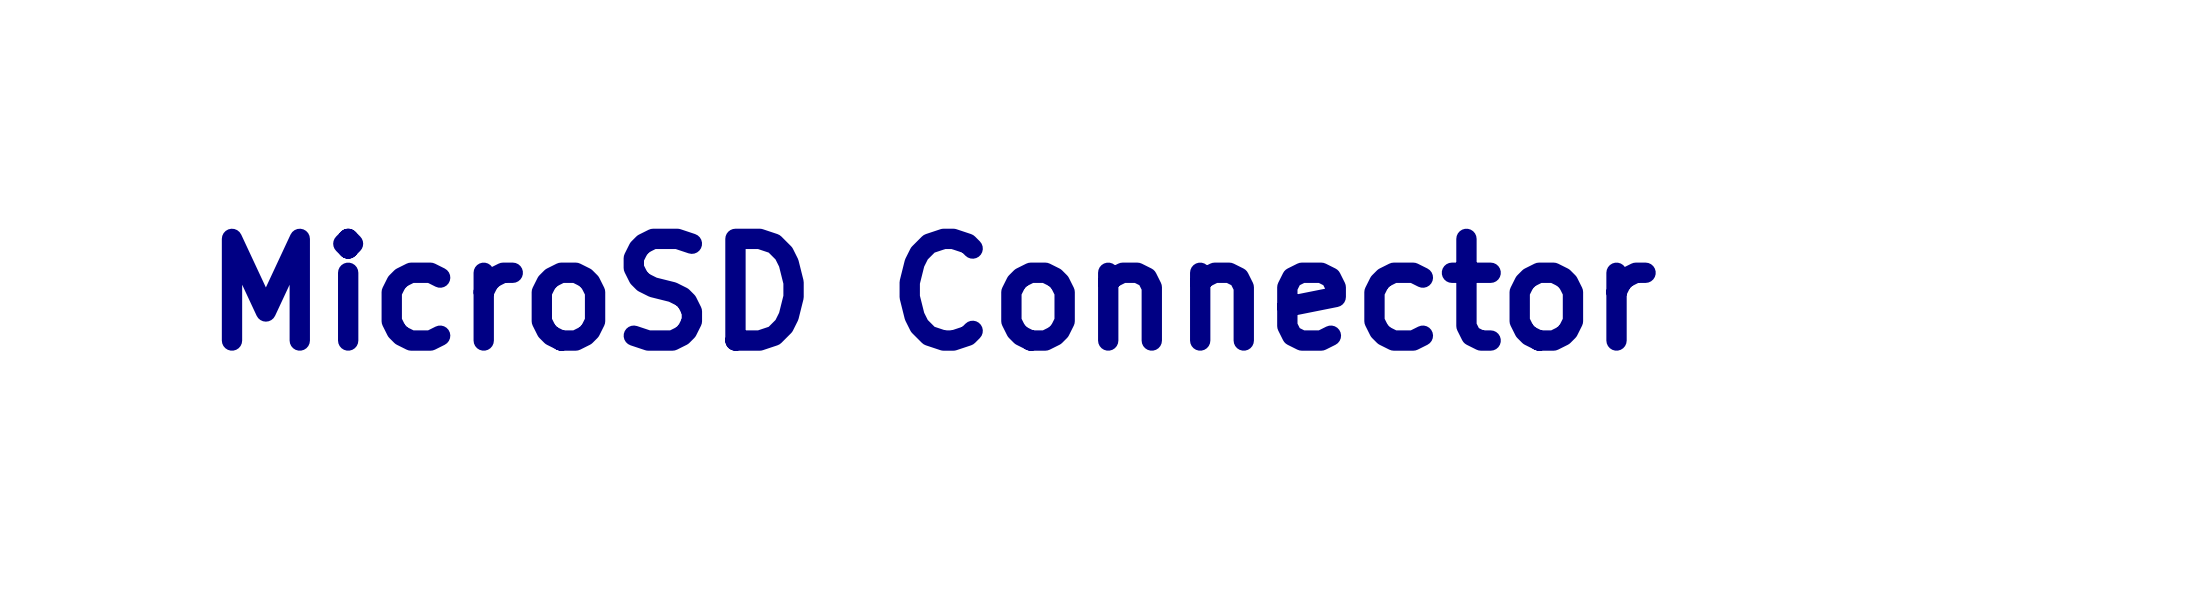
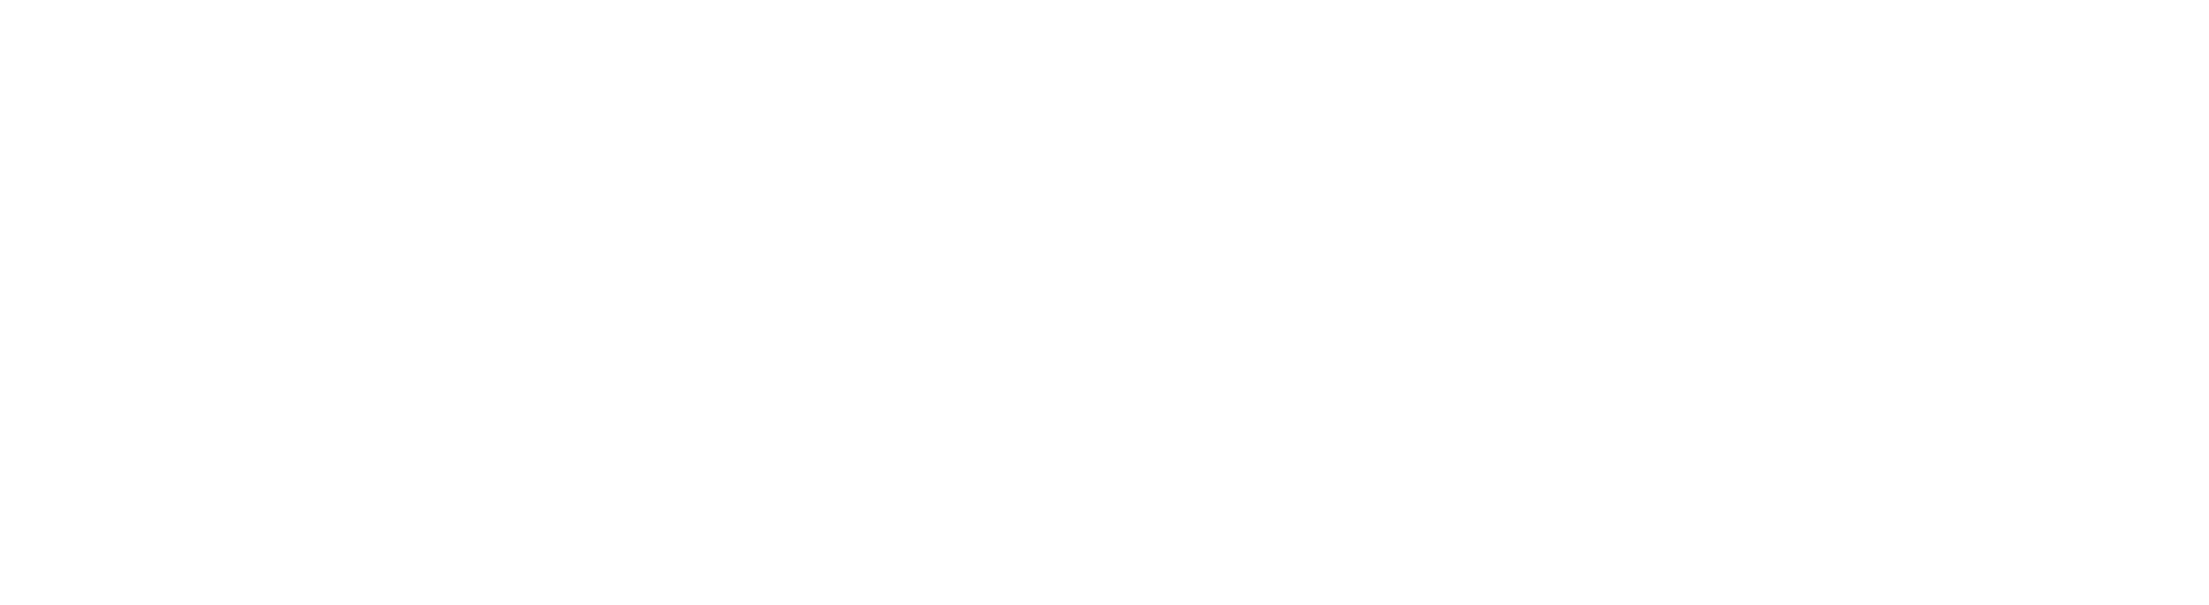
text: MicroSD Connector (938, 289) -> none

